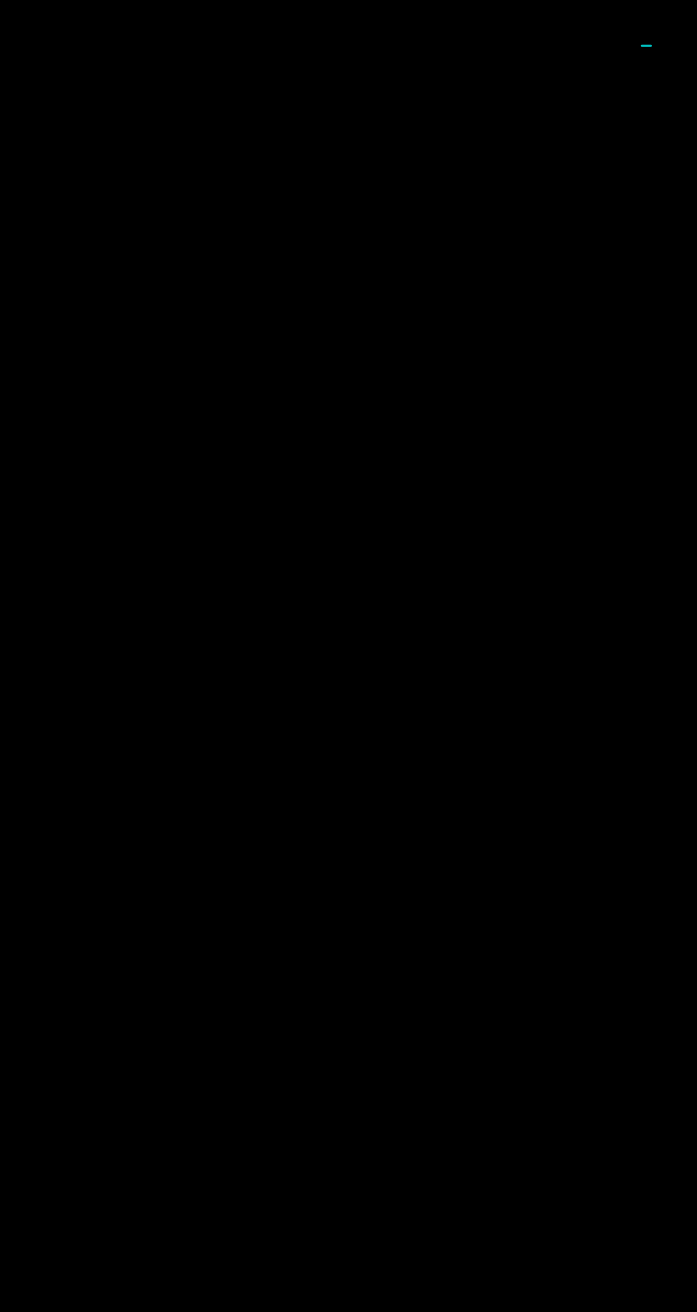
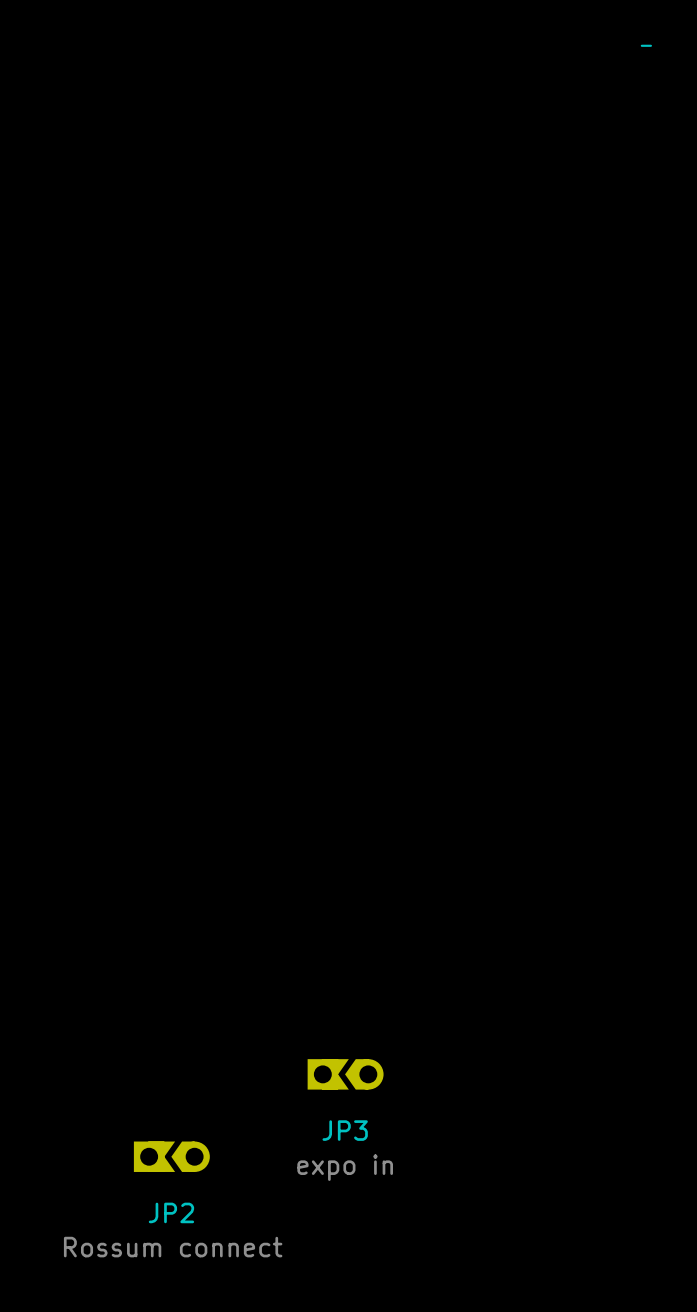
JP3: none -> expo in (345, 1074)
JP2: none -> Rossum connect (171, 1156)

